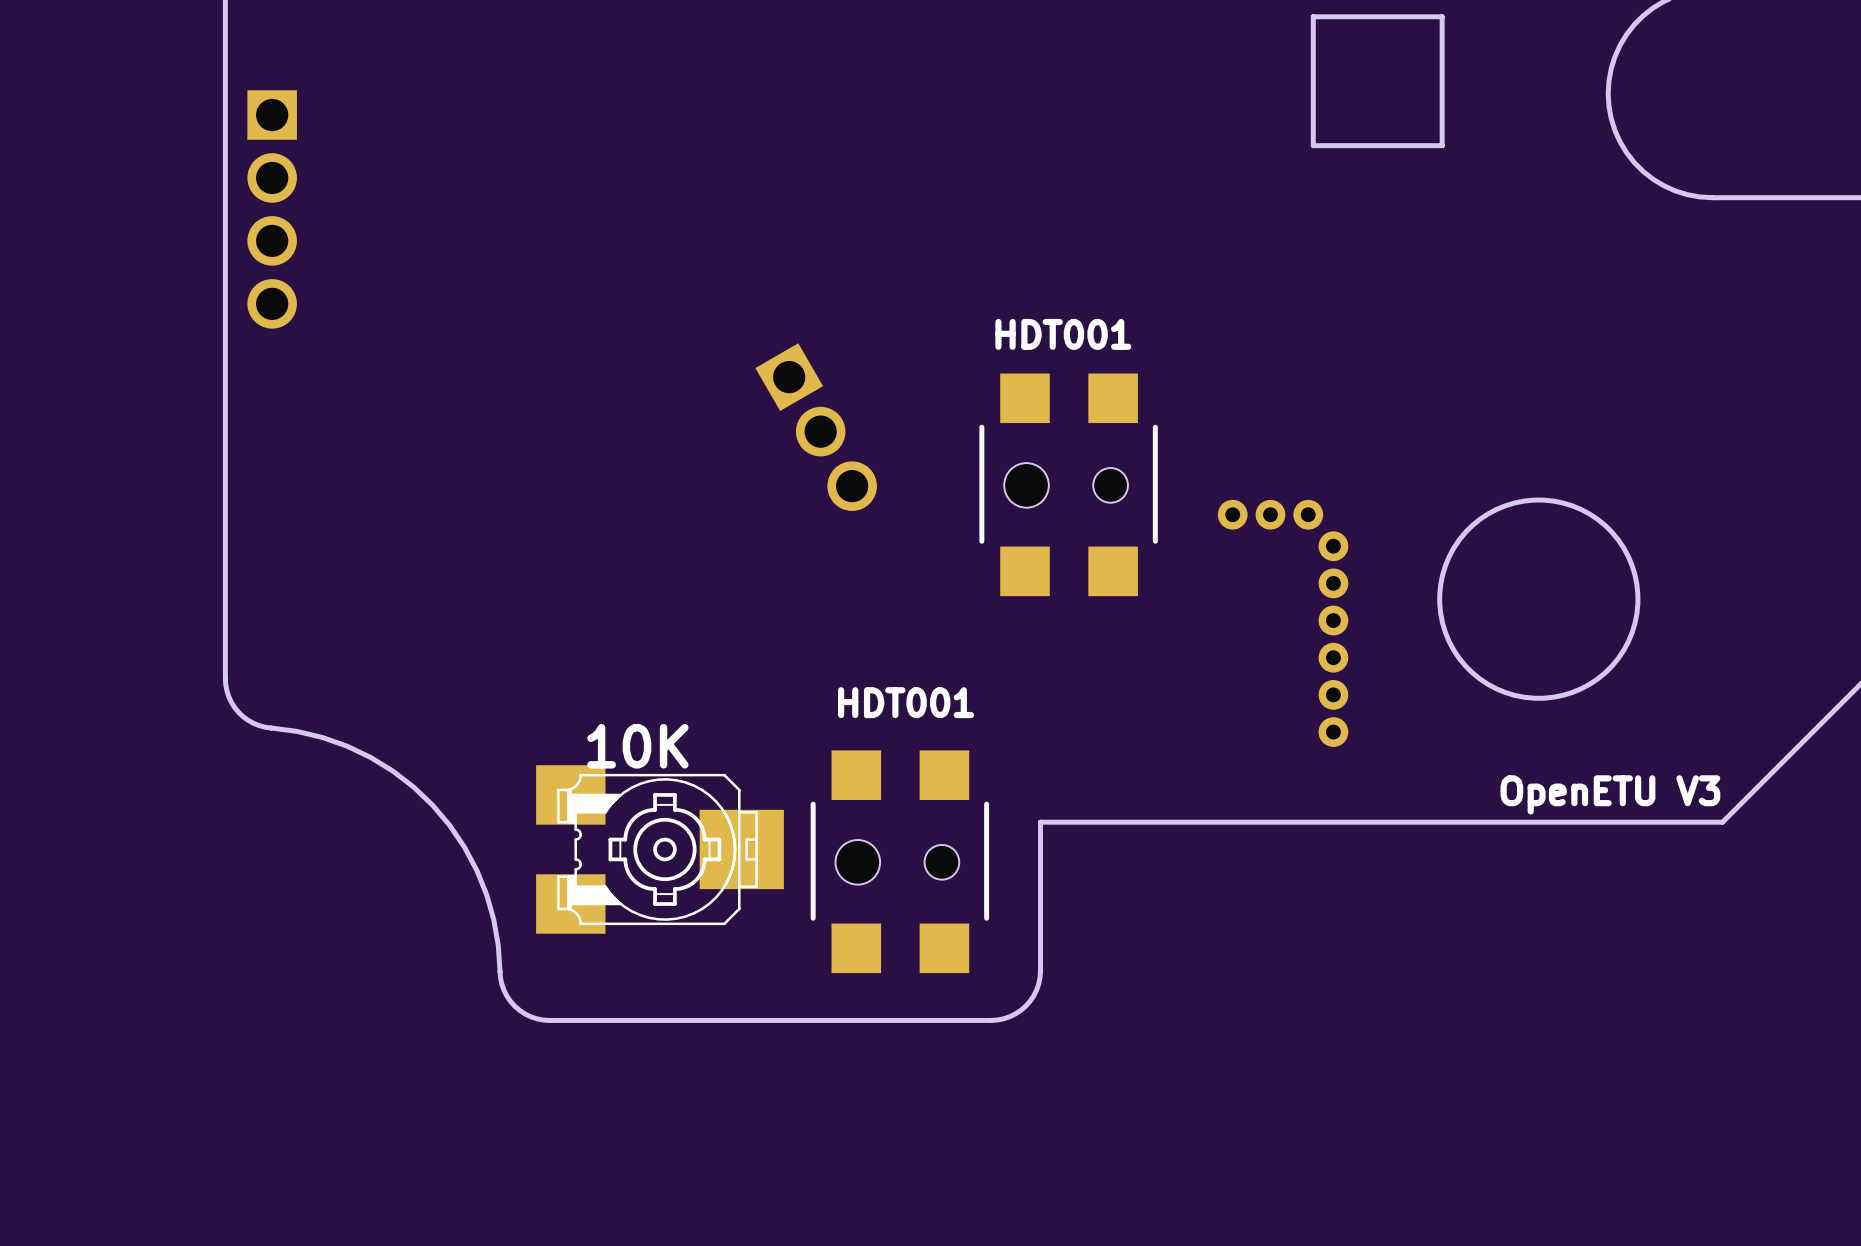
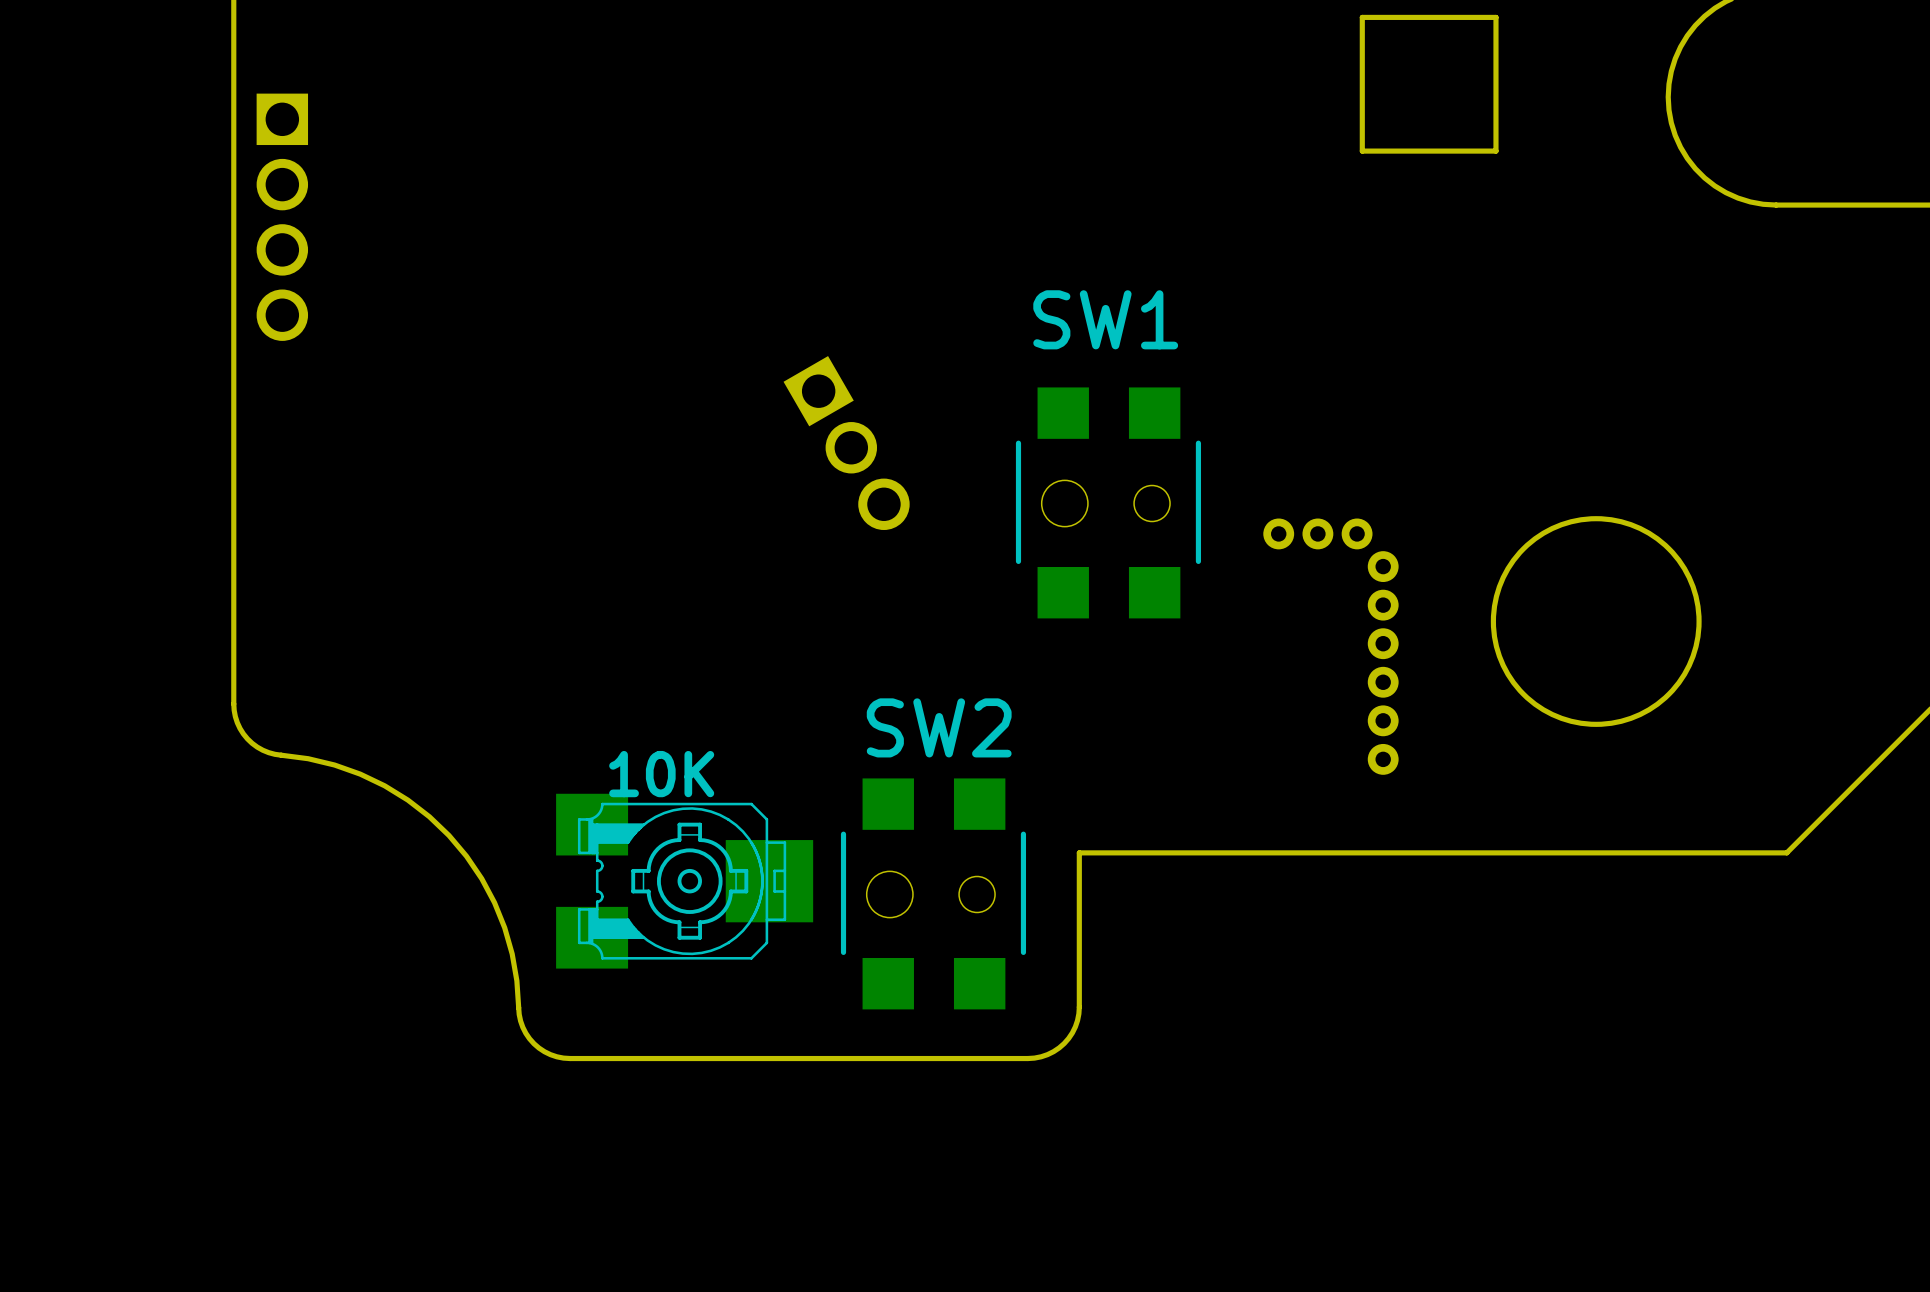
HDT001 name: HDT001 (1063, 334) -> SW1 (1105, 319)
HDT001 name: HDT001 (905, 702) -> SW2 (939, 727)
text: OpenETU V3 (1610, 794) -> none

